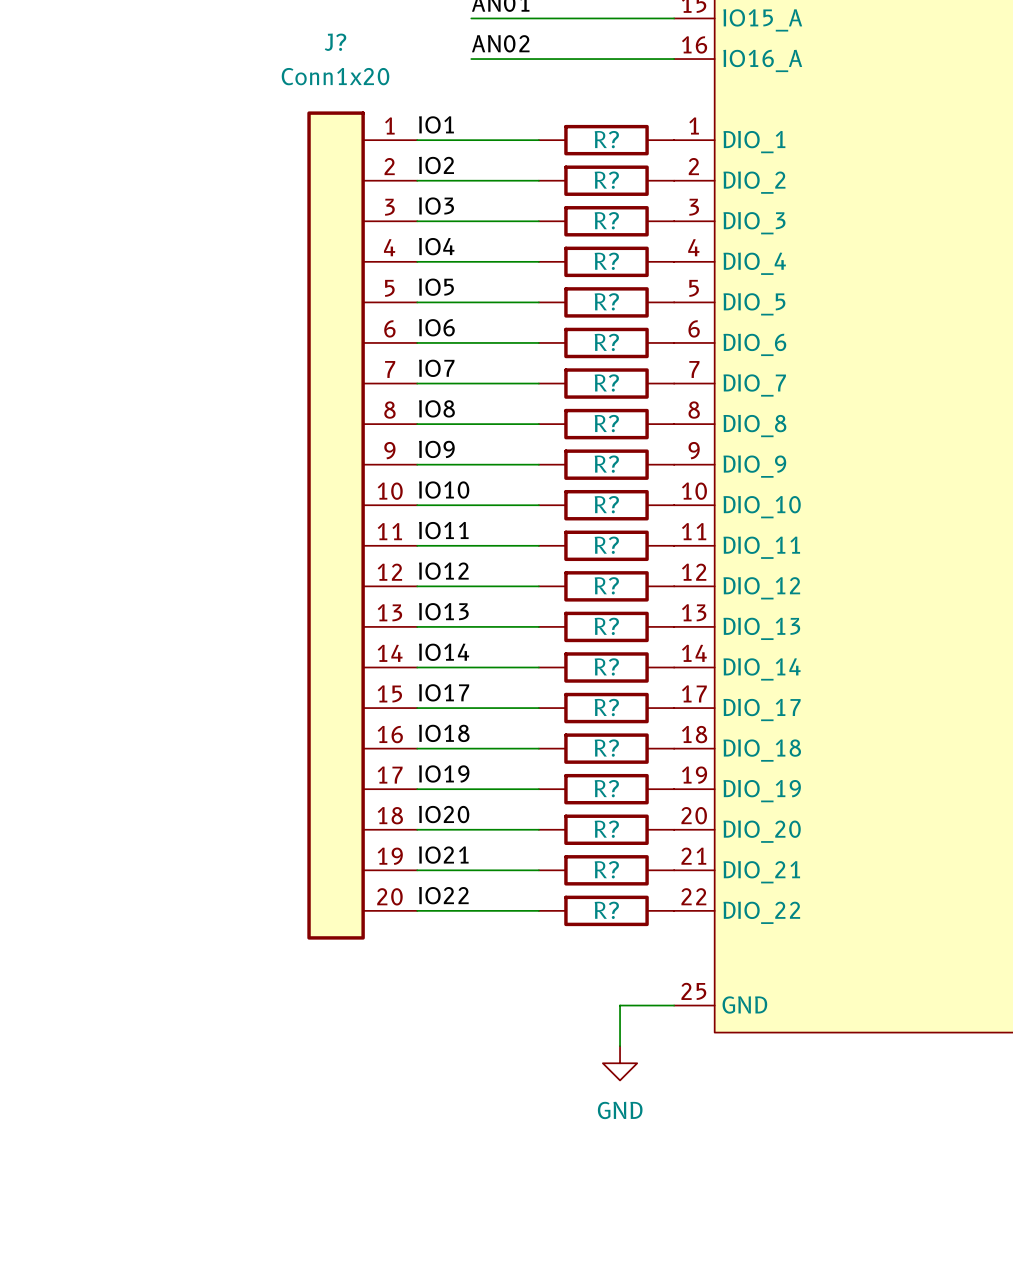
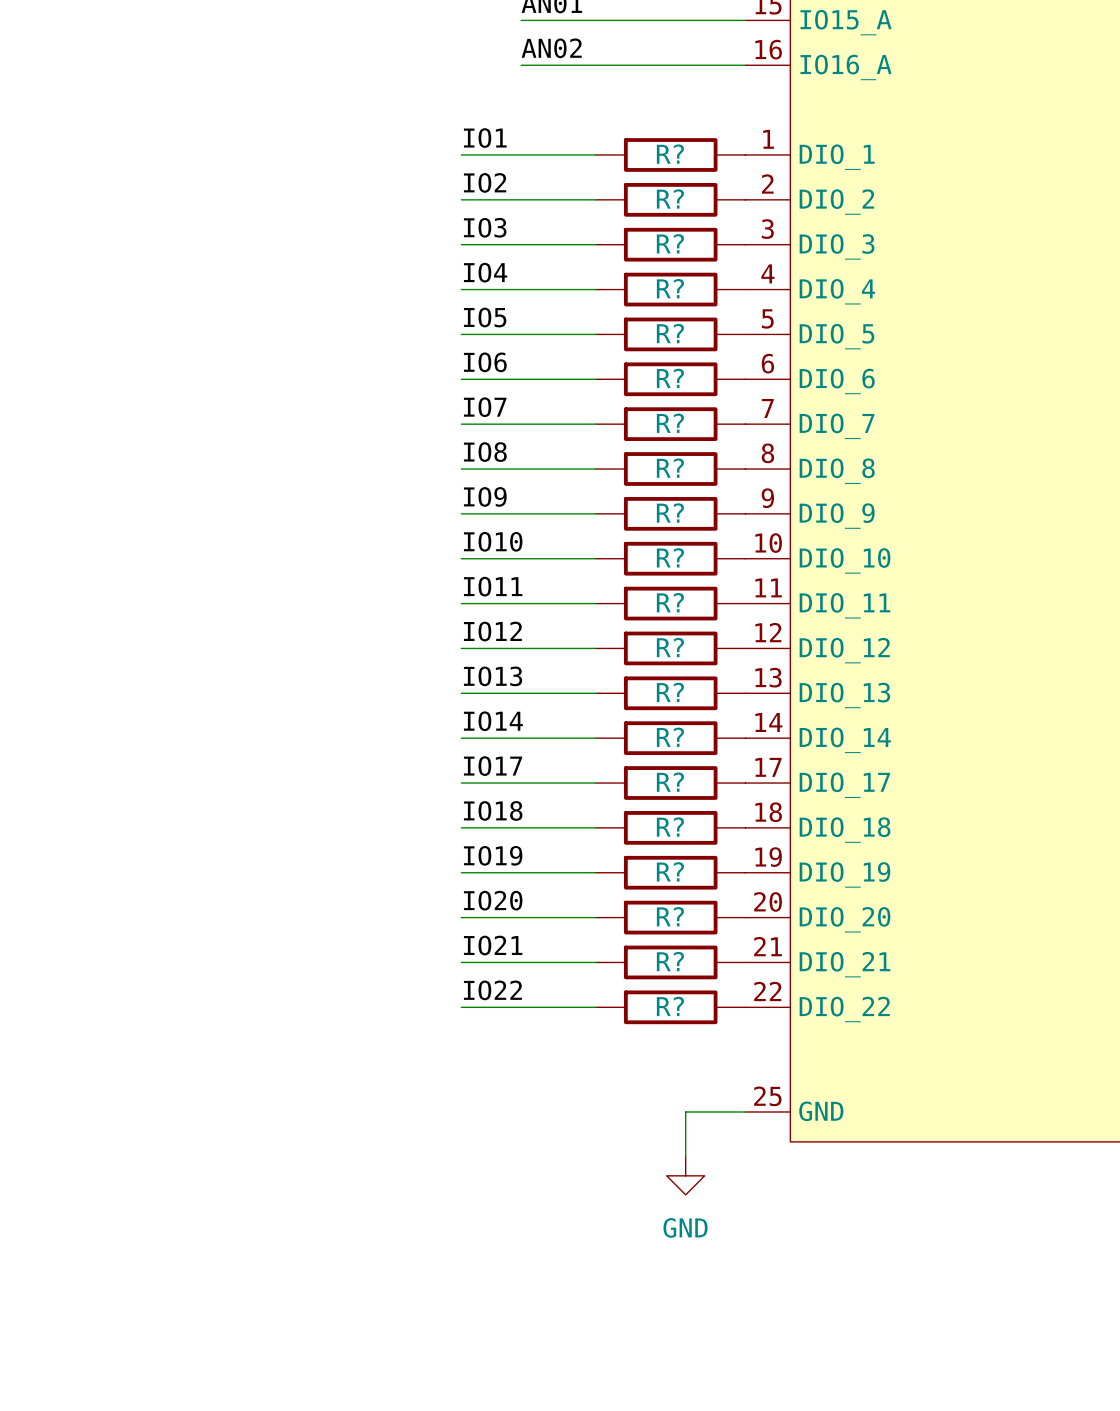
J?: Conn1x20 (362, 525) -> none

